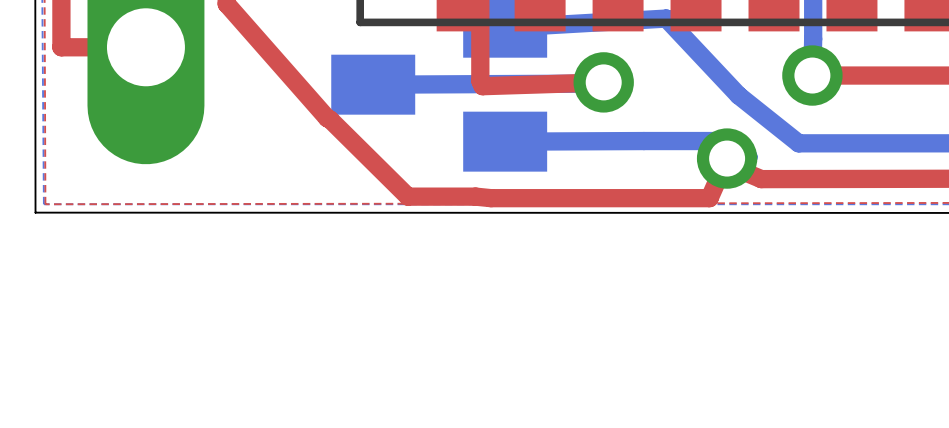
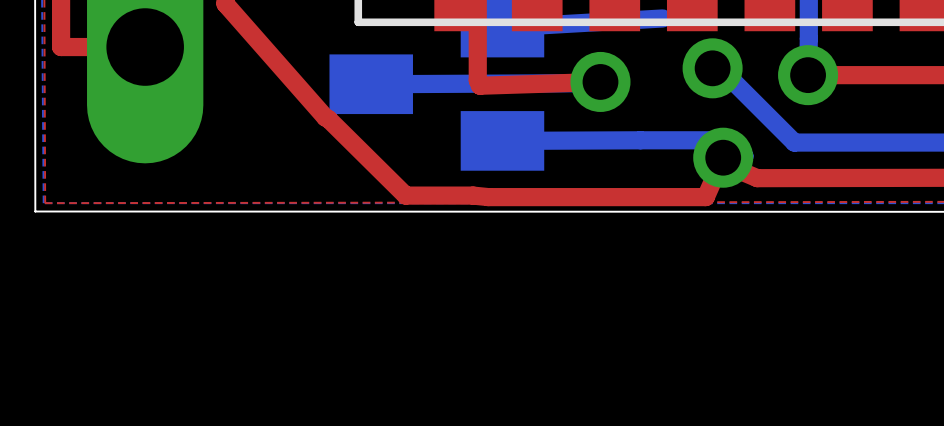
bottom track: (666, 18) (738, 95) (798, 143) -> (717, 67) (719, 67) (794, 142)
via: none -> (712, 68)

